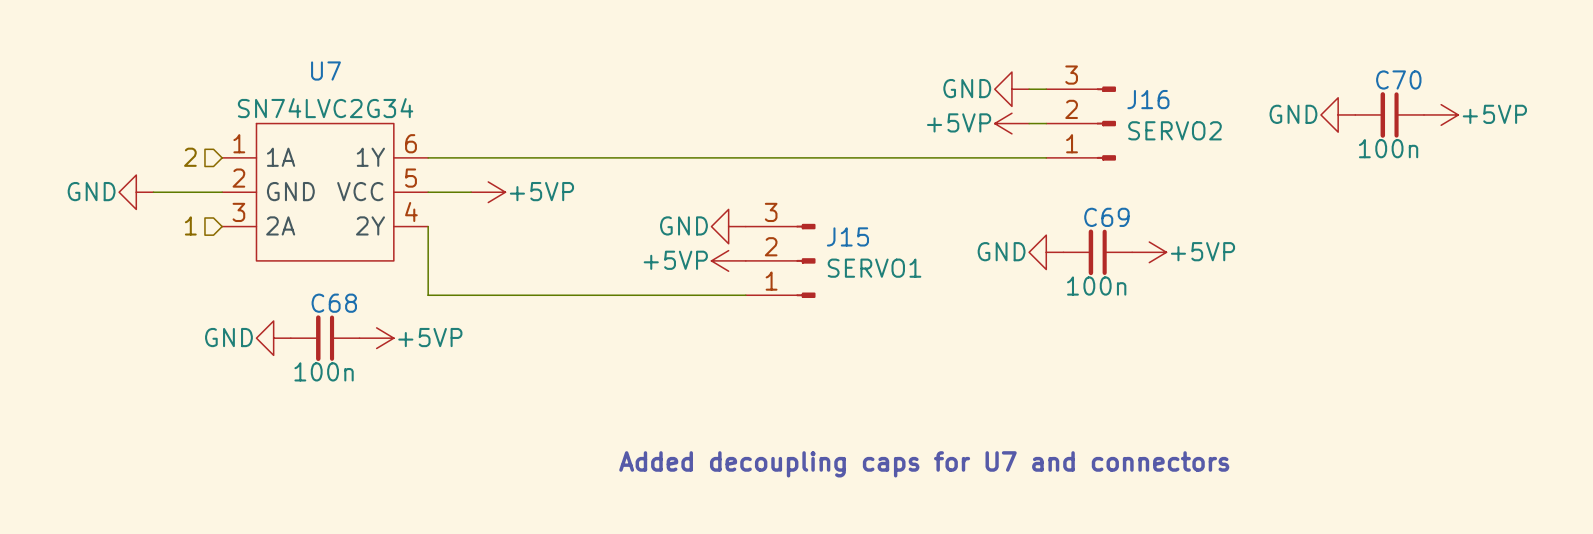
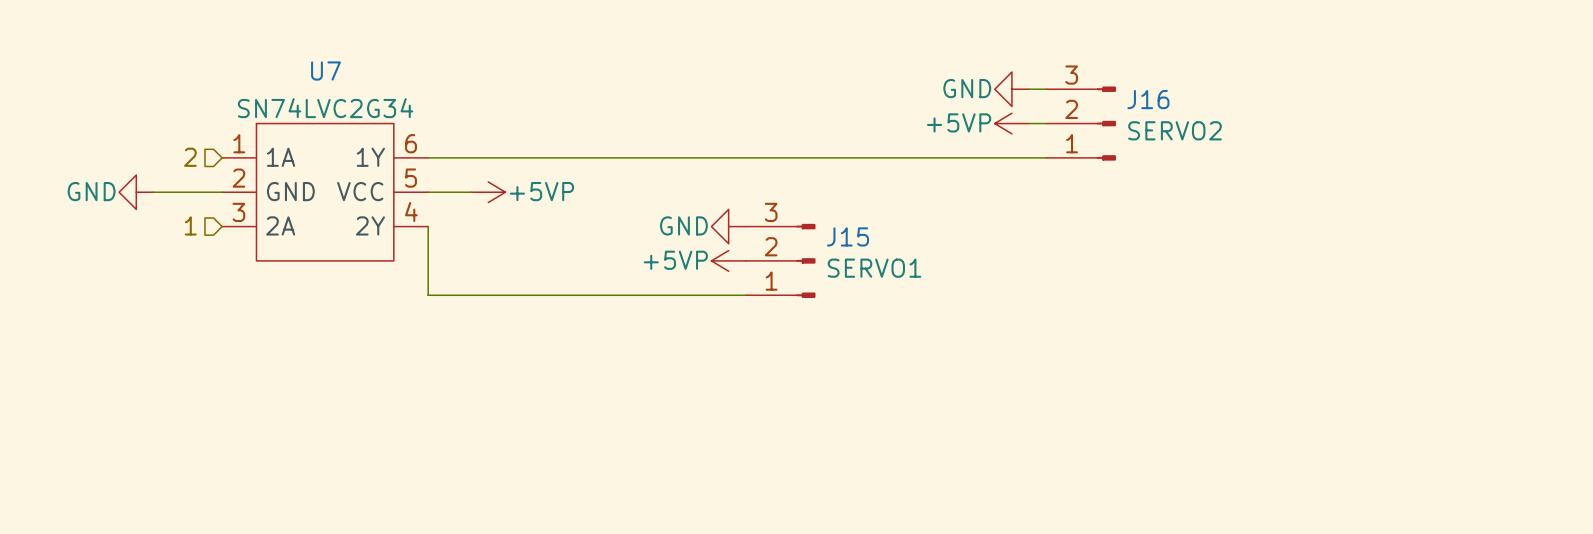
power symbol: GND (1338, 114) -> none
C70: 100n (1389, 114) -> none
power symbol: +5VP (1441, 114) -> none
power symbol: GND (1046, 252) -> none
C69: 100n (1097, 252) -> none
power symbol: +5VP (1149, 252) -> none
power symbol: GND (273, 338) -> none
C68: 100n (325, 338) -> none
power symbol: +5VP (376, 338) -> none
text: Added decoupling caps for U7 and connectors (924, 464) -> none

